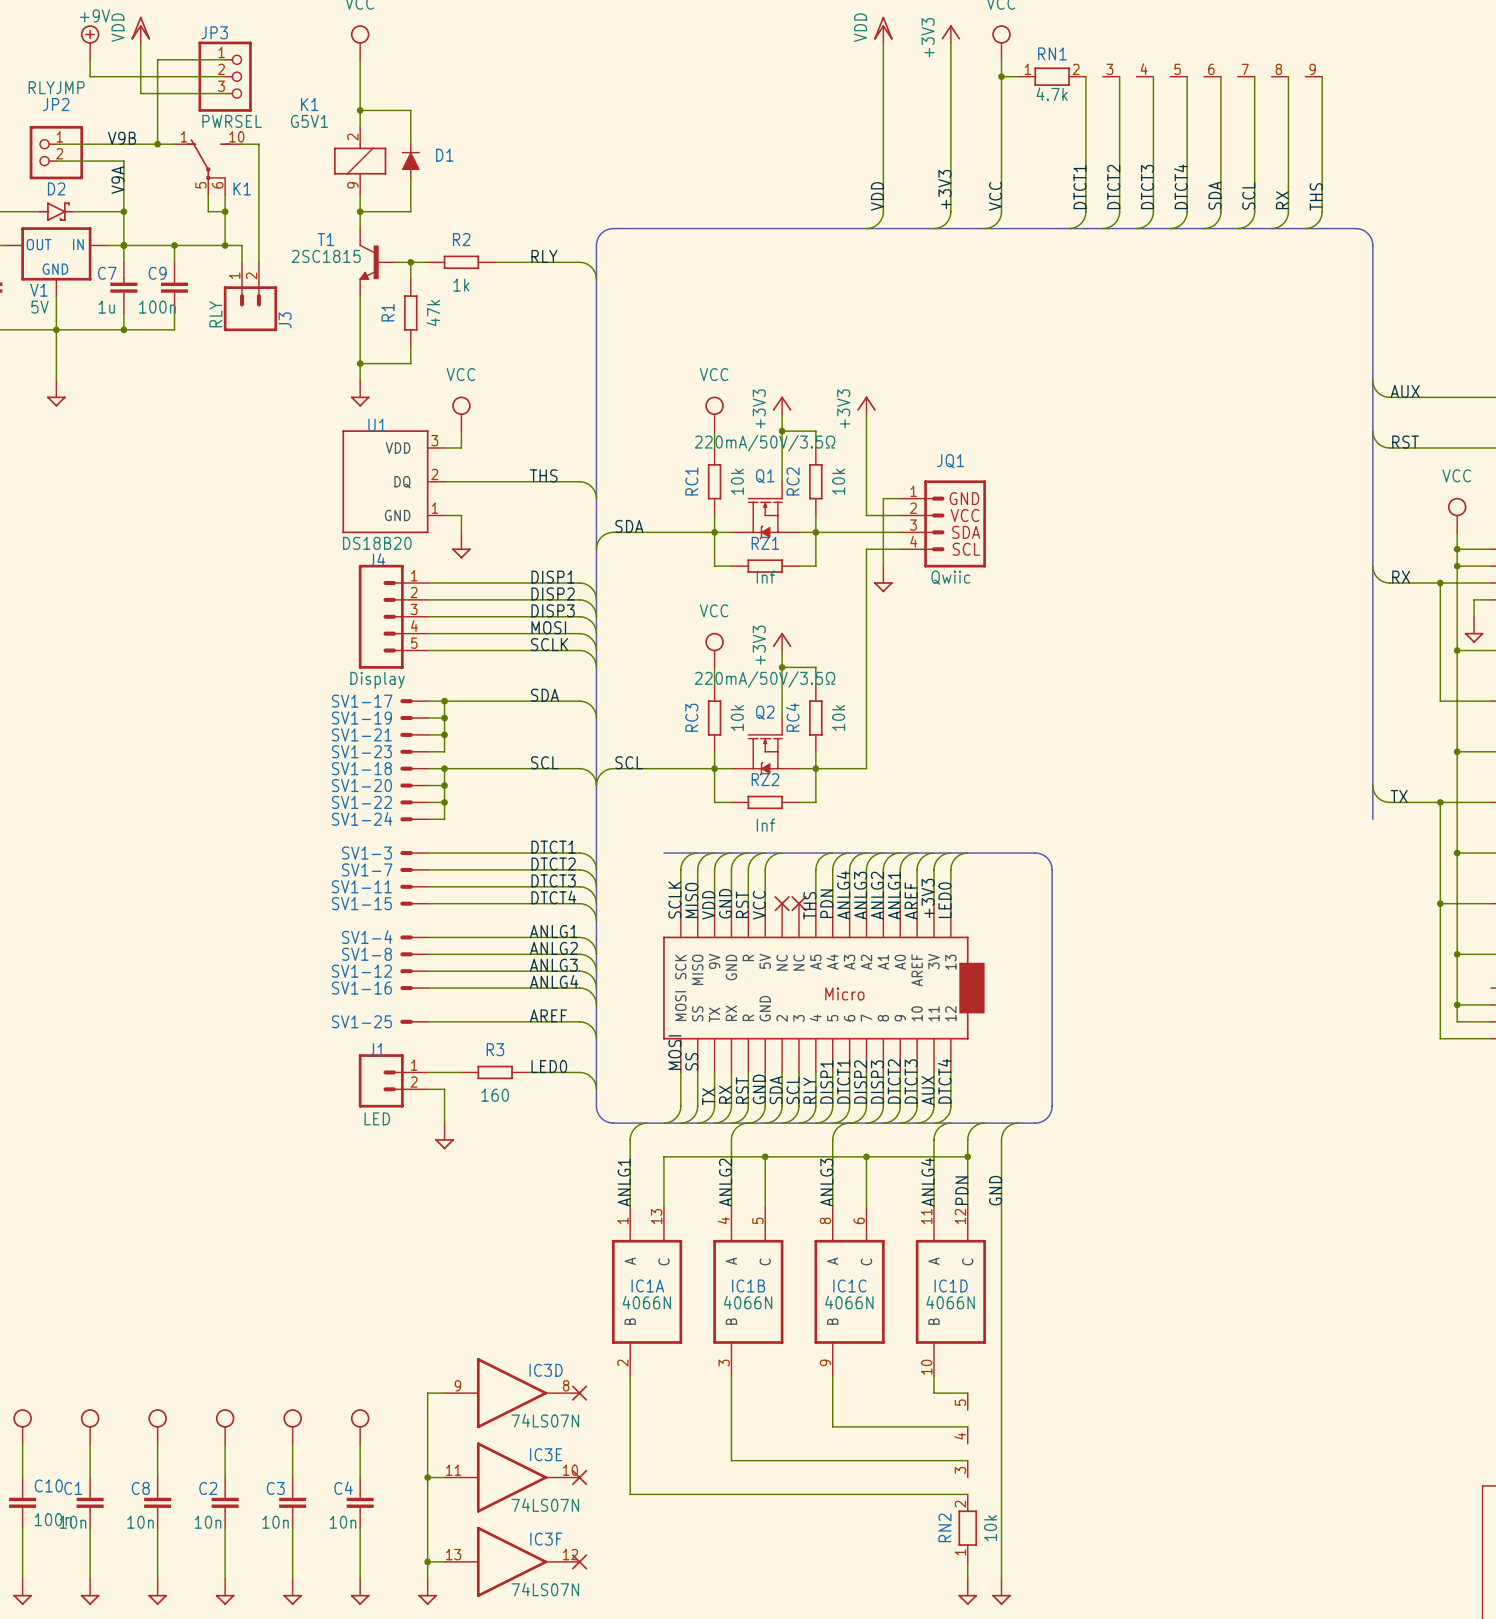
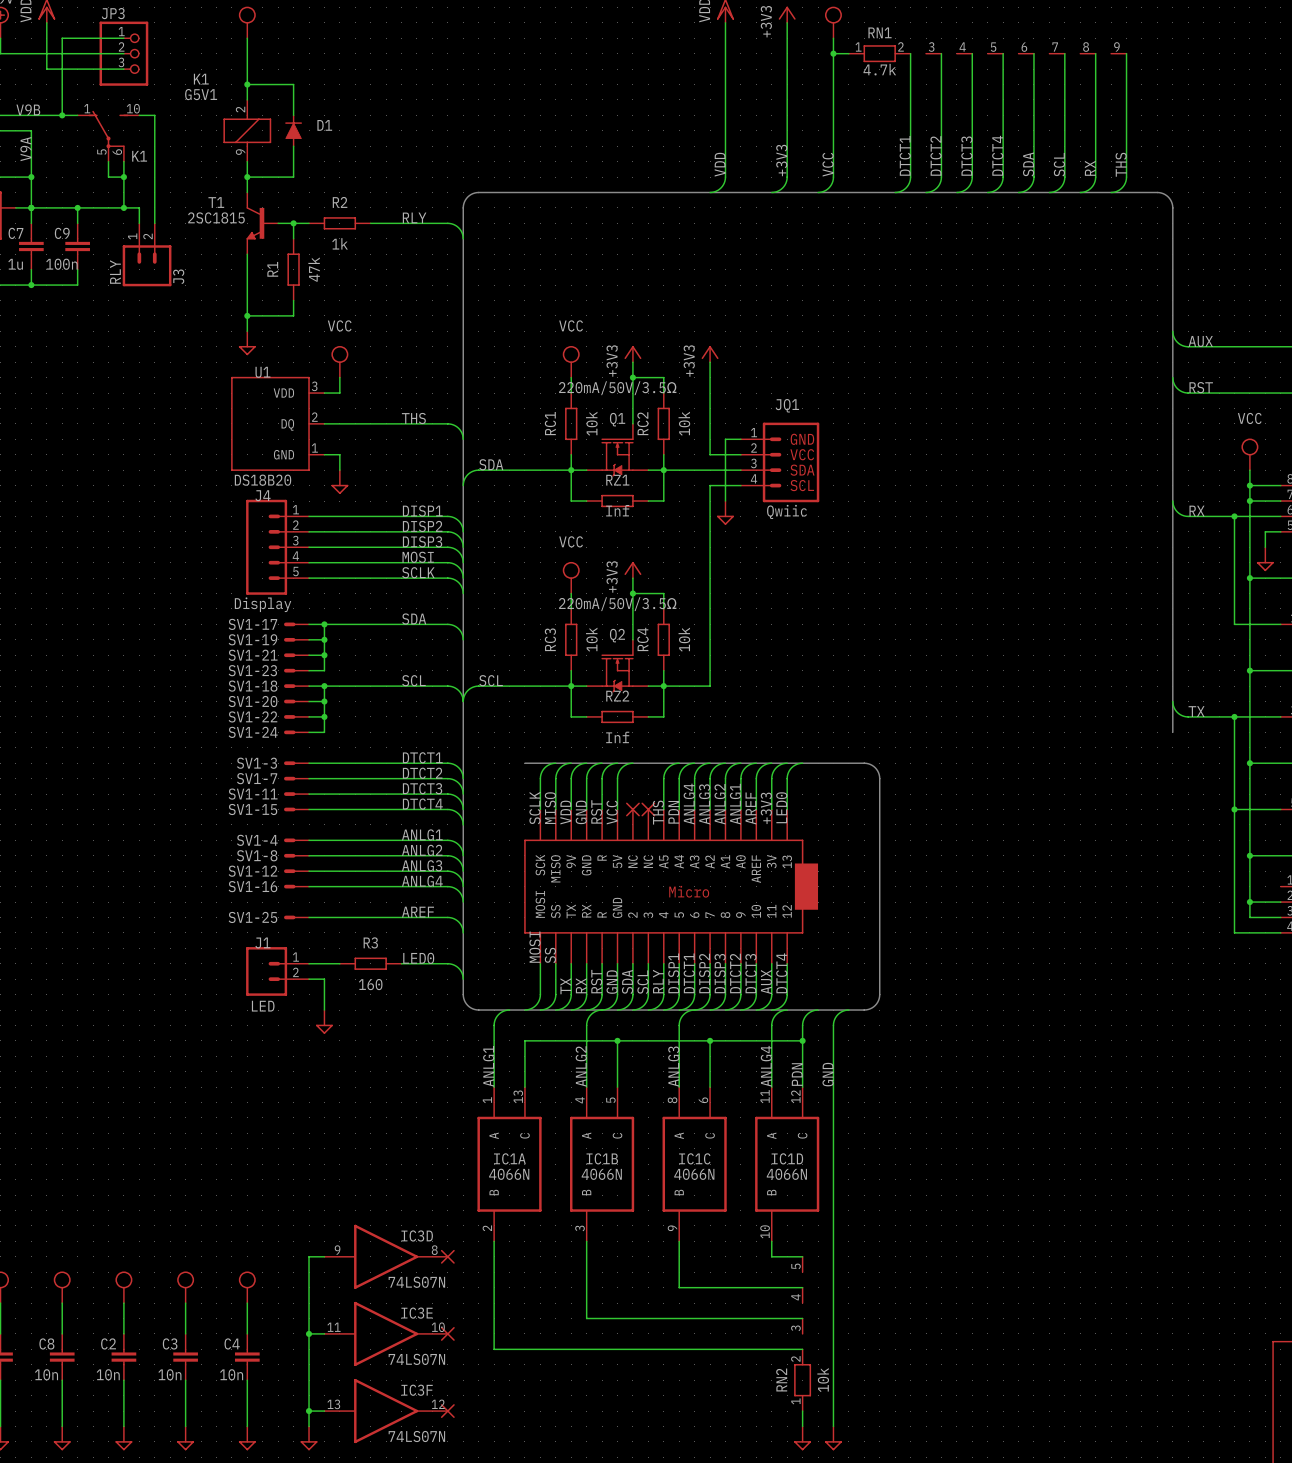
JP3 value: PWRSEL (232, 121) -> none

